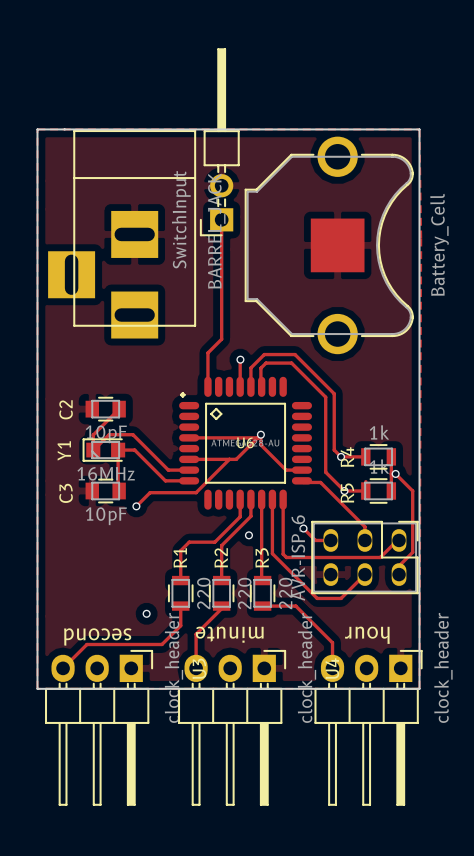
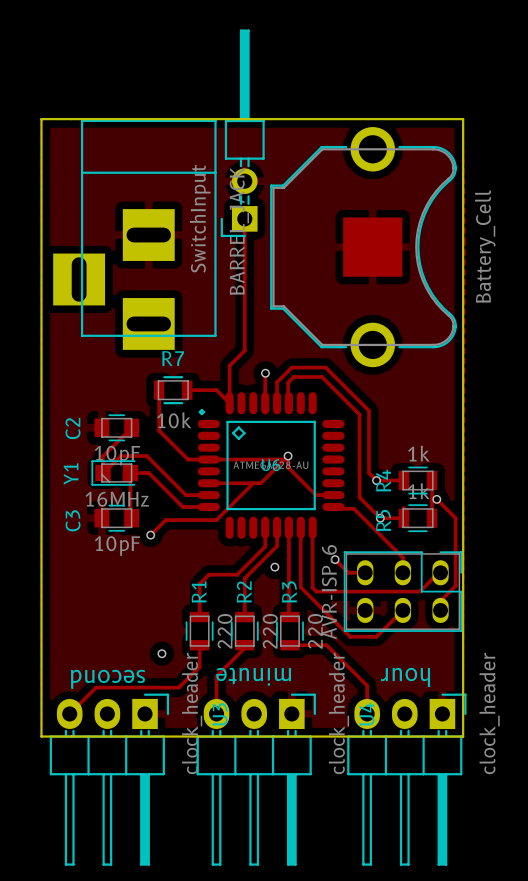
track: none -> (159, 390) (159, 430) (188, 459) (208, 459)
R7: none -> 10k (173, 390)
track: none -> (187, 390) (216, 390) (229, 403)

